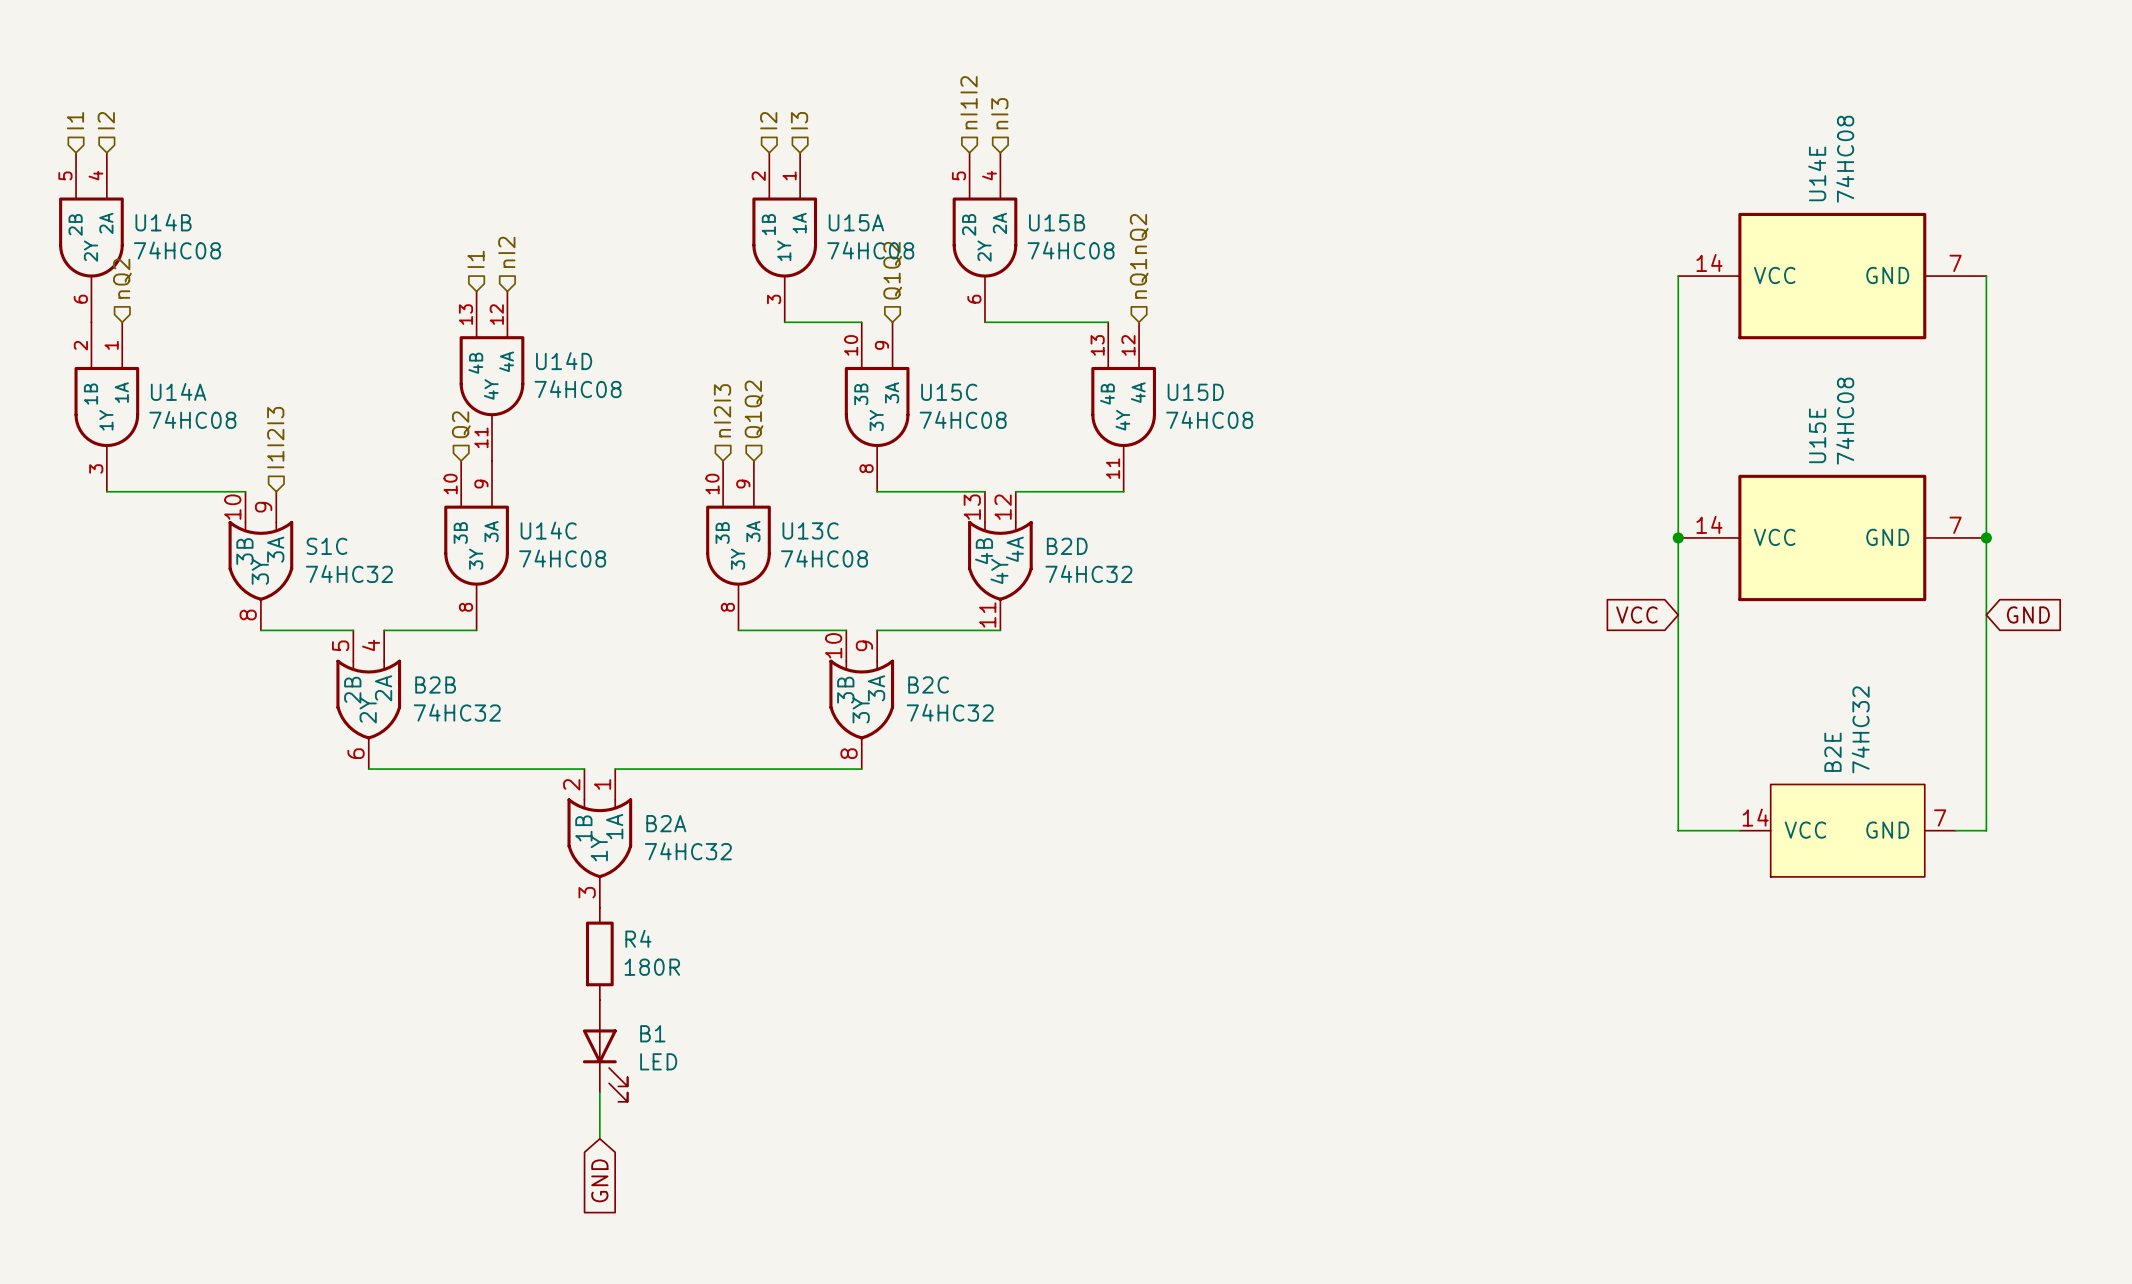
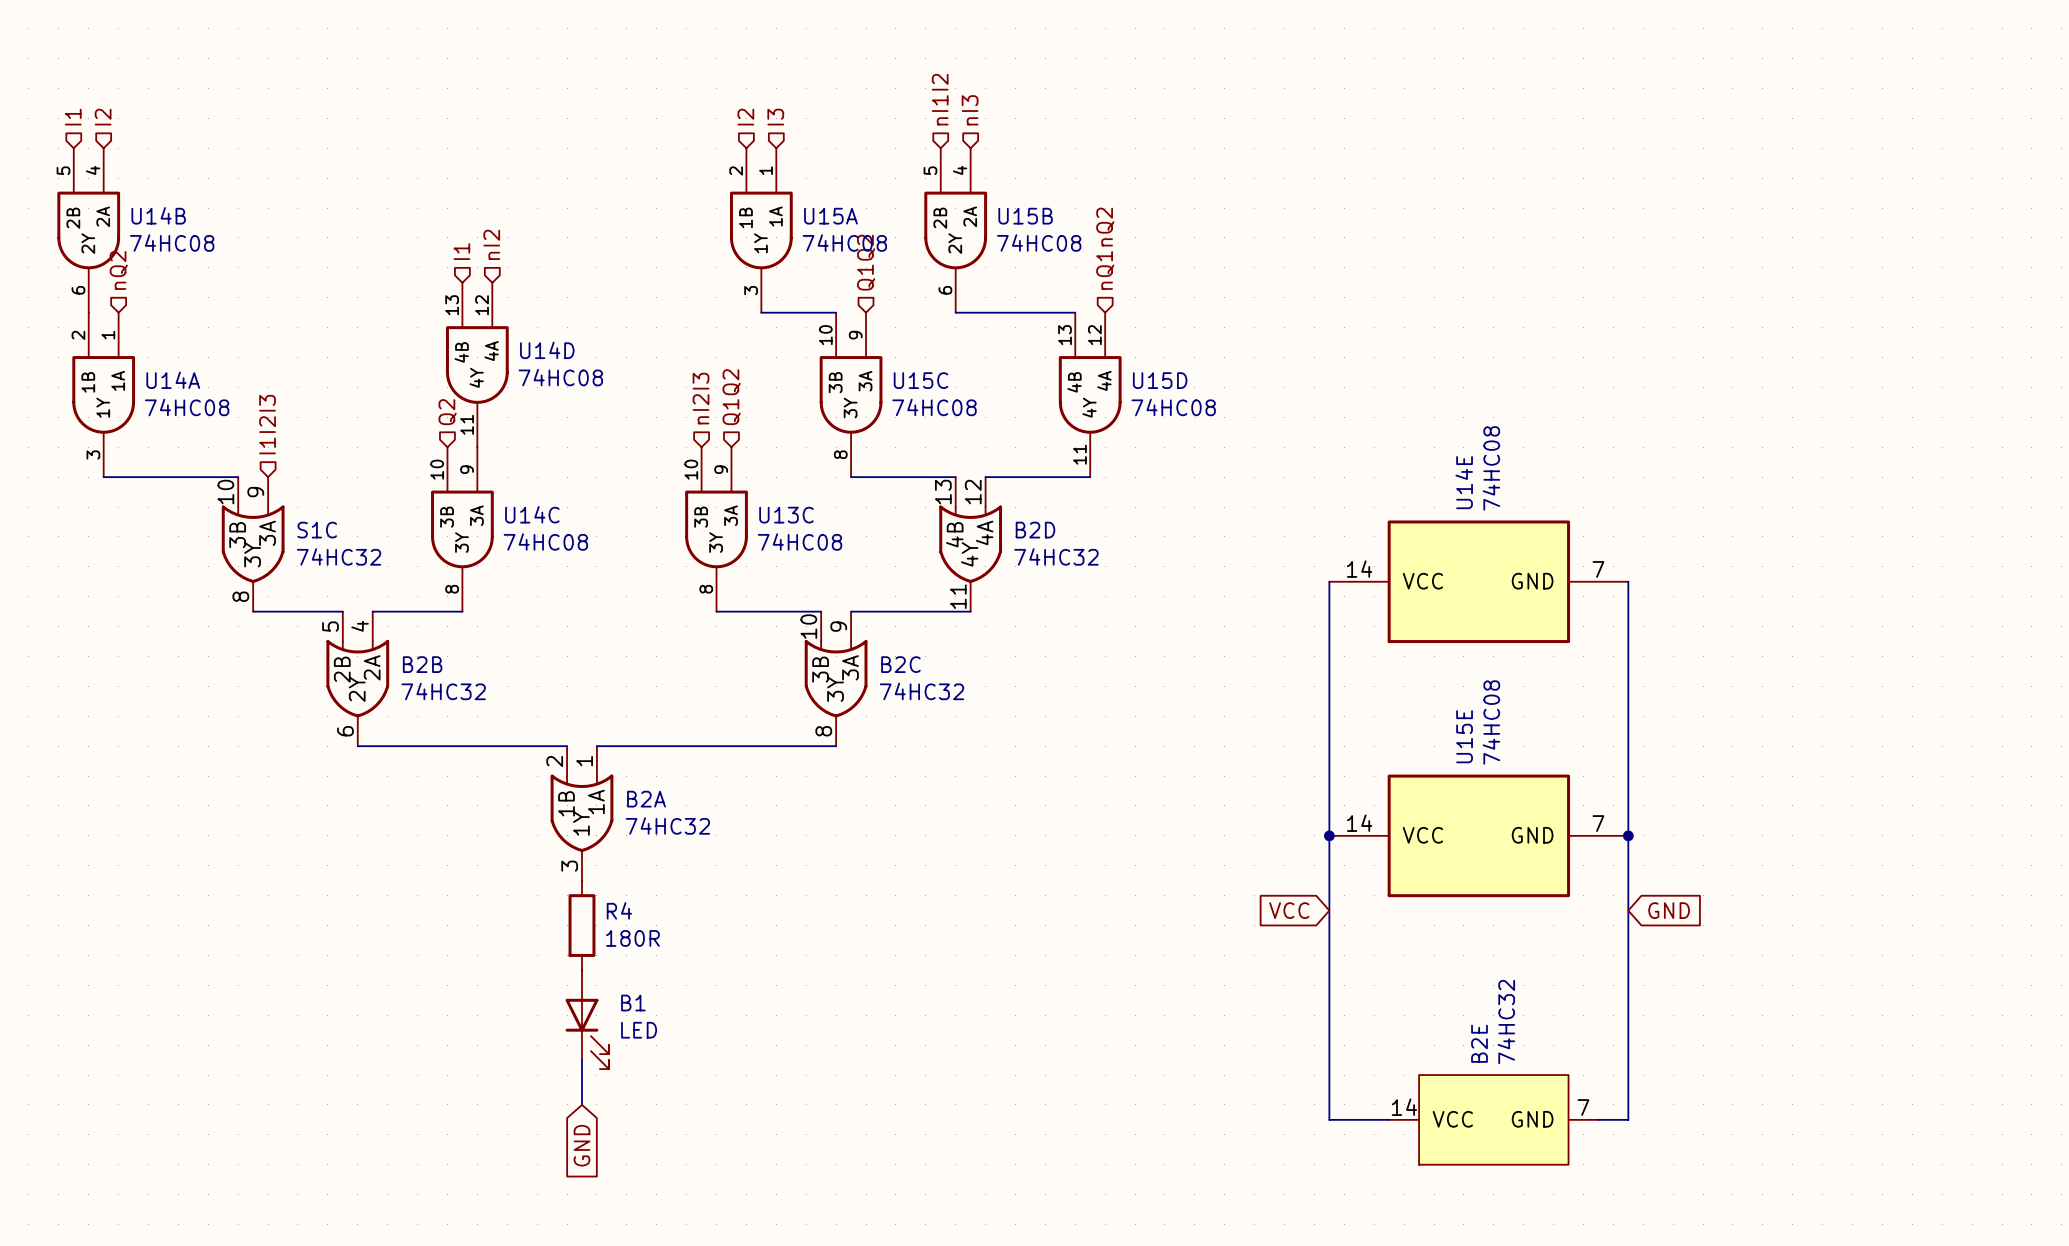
wire: (1678, 276) (1678, 599) -> none
U14E position: (1832, 276) -> (1478, 581)
wire: (1986, 276) (1986, 830) (1955, 830) -> none
junction: (1678, 537) -> none
U15E position: (1832, 537) -> (1478, 835)
junction: (1986, 537) -> none
wire: none -> (1329, 581) (1329, 1119) (1389, 1119)
global label: VCC (1636, 615) -> none
global label: GND (2028, 615) -> none
wire: (1678, 830) (1739, 830) -> (1628, 805) (1628, 1119) (1598, 1119)
B2E position: (1847, 830) -> (1493, 1119)
junction: none -> (1329, 835)
junction: none -> (1628, 835)
global label: none -> VCC (1289, 910)
global label: none -> GND (1669, 910)

